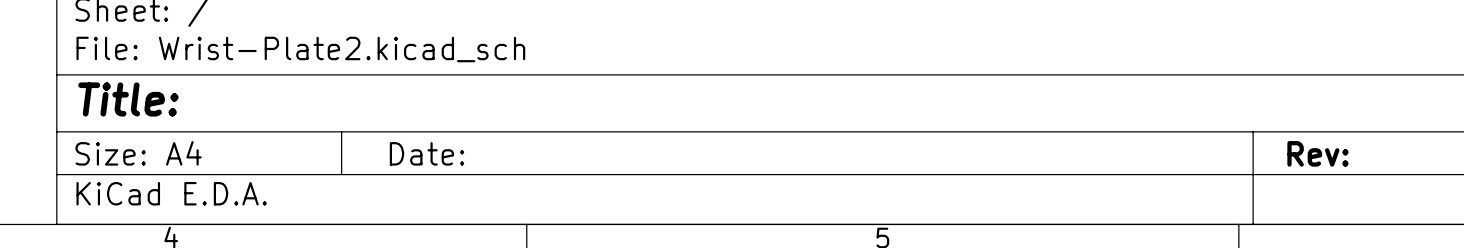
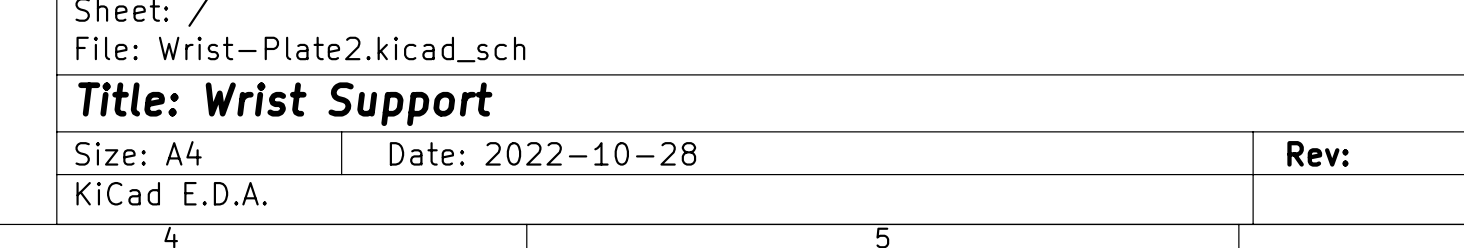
title block: Title: (128, 99) -> Title: Wrist Support (285, 104)
title block: Date: (427, 153) -> Date: 2022-10-28 (542, 153)

